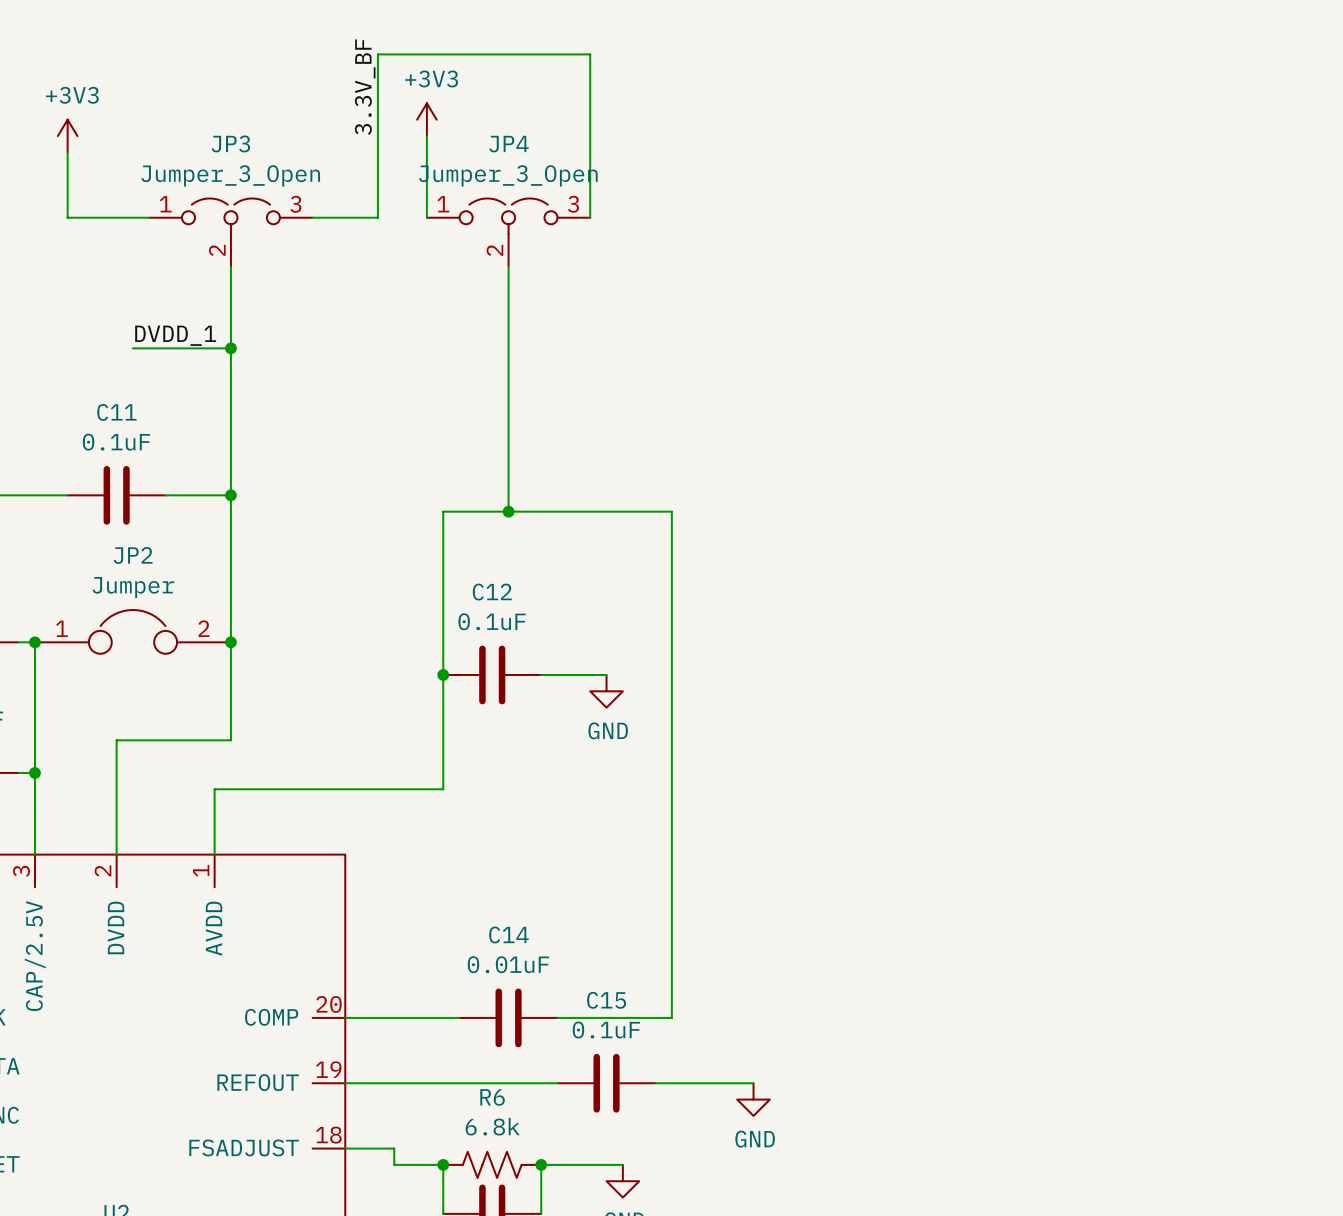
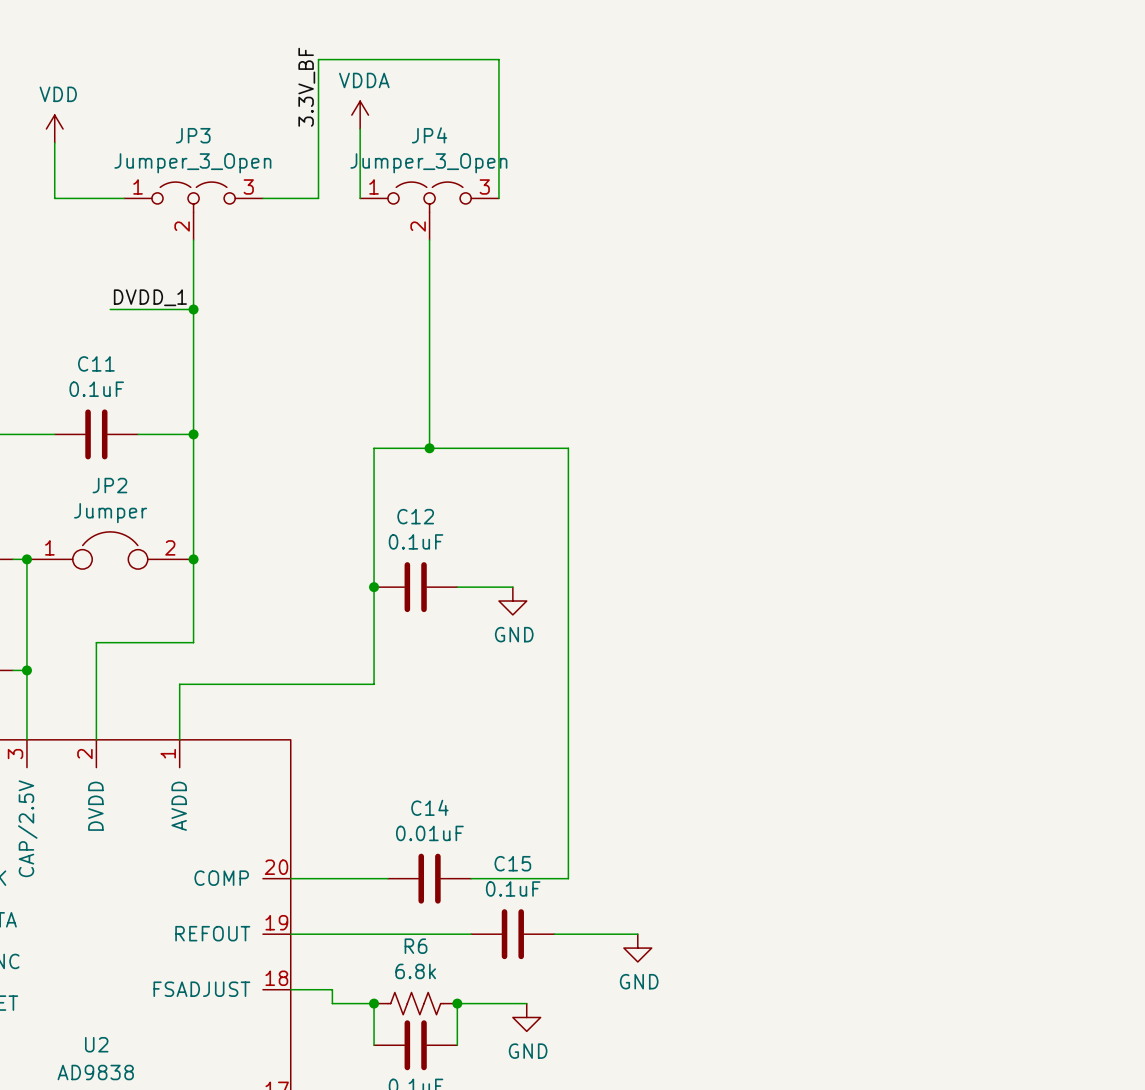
power symbol: +3V3 (426, 119) -> VDDA (360, 115)
power symbol: +3V3 (67, 136) -> VDD (54, 129)

